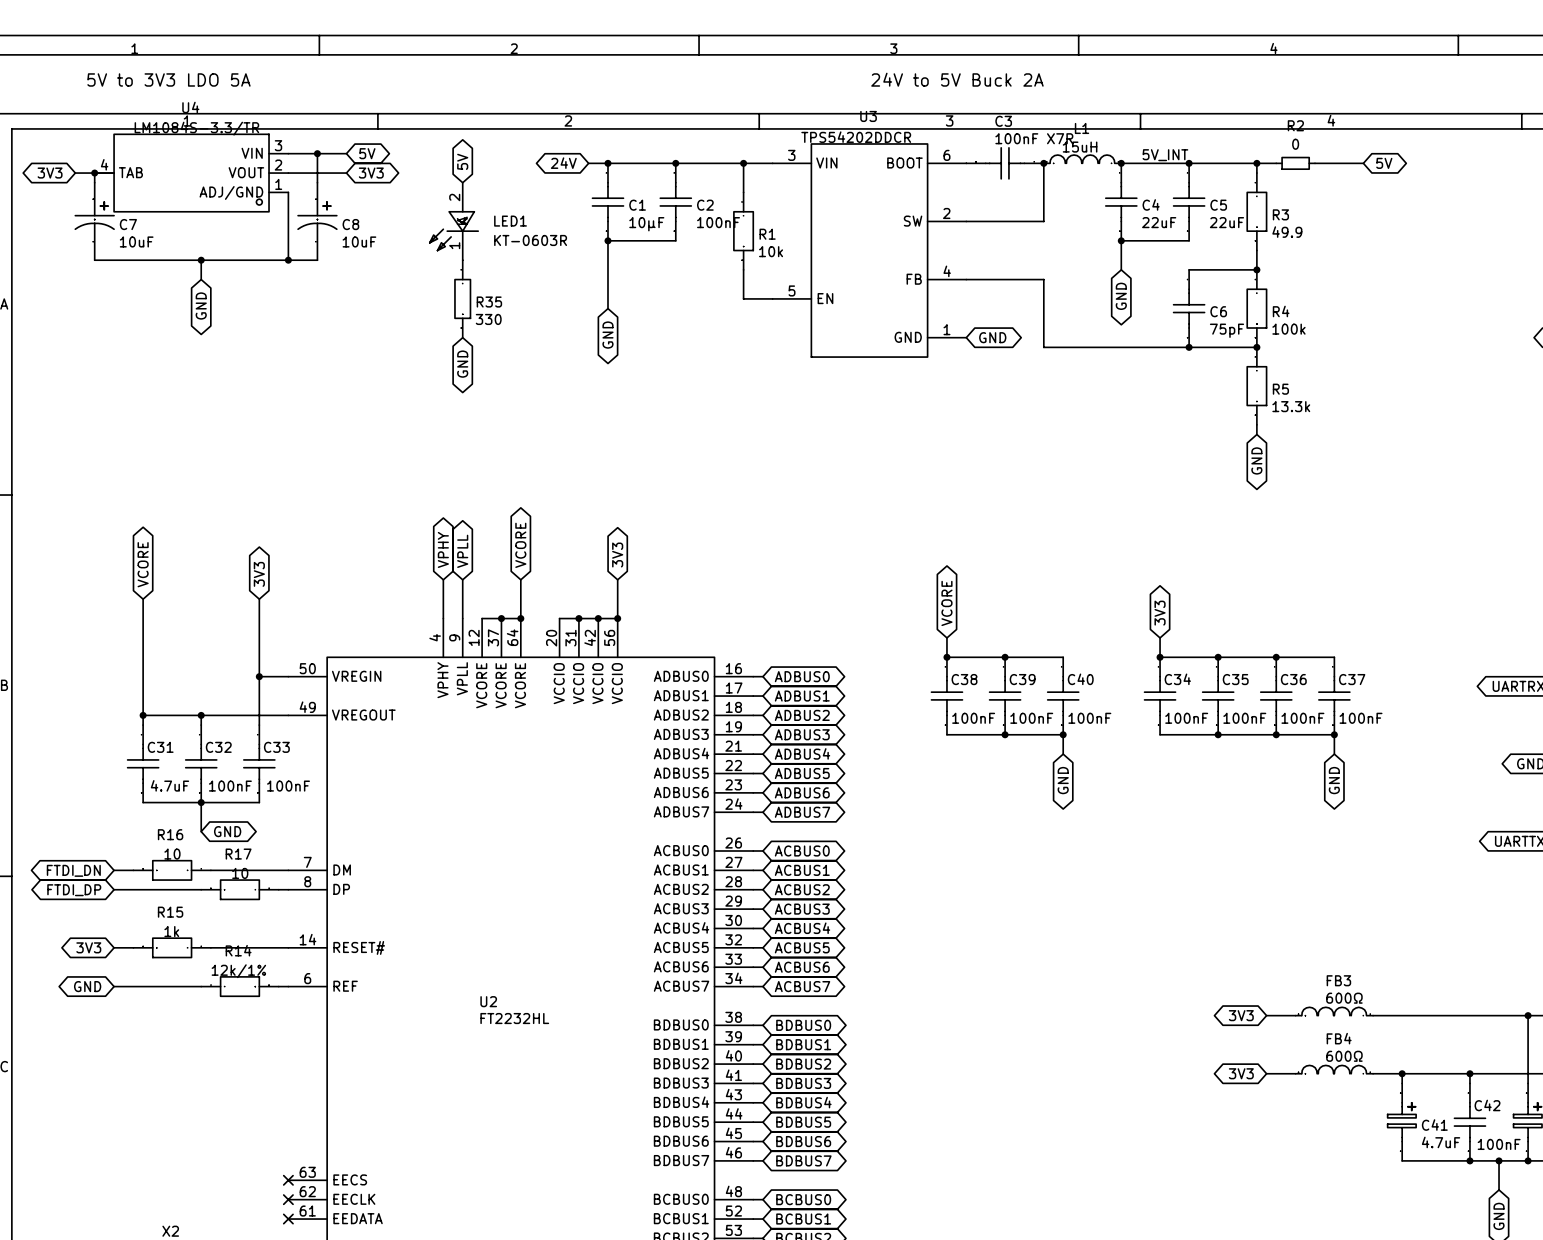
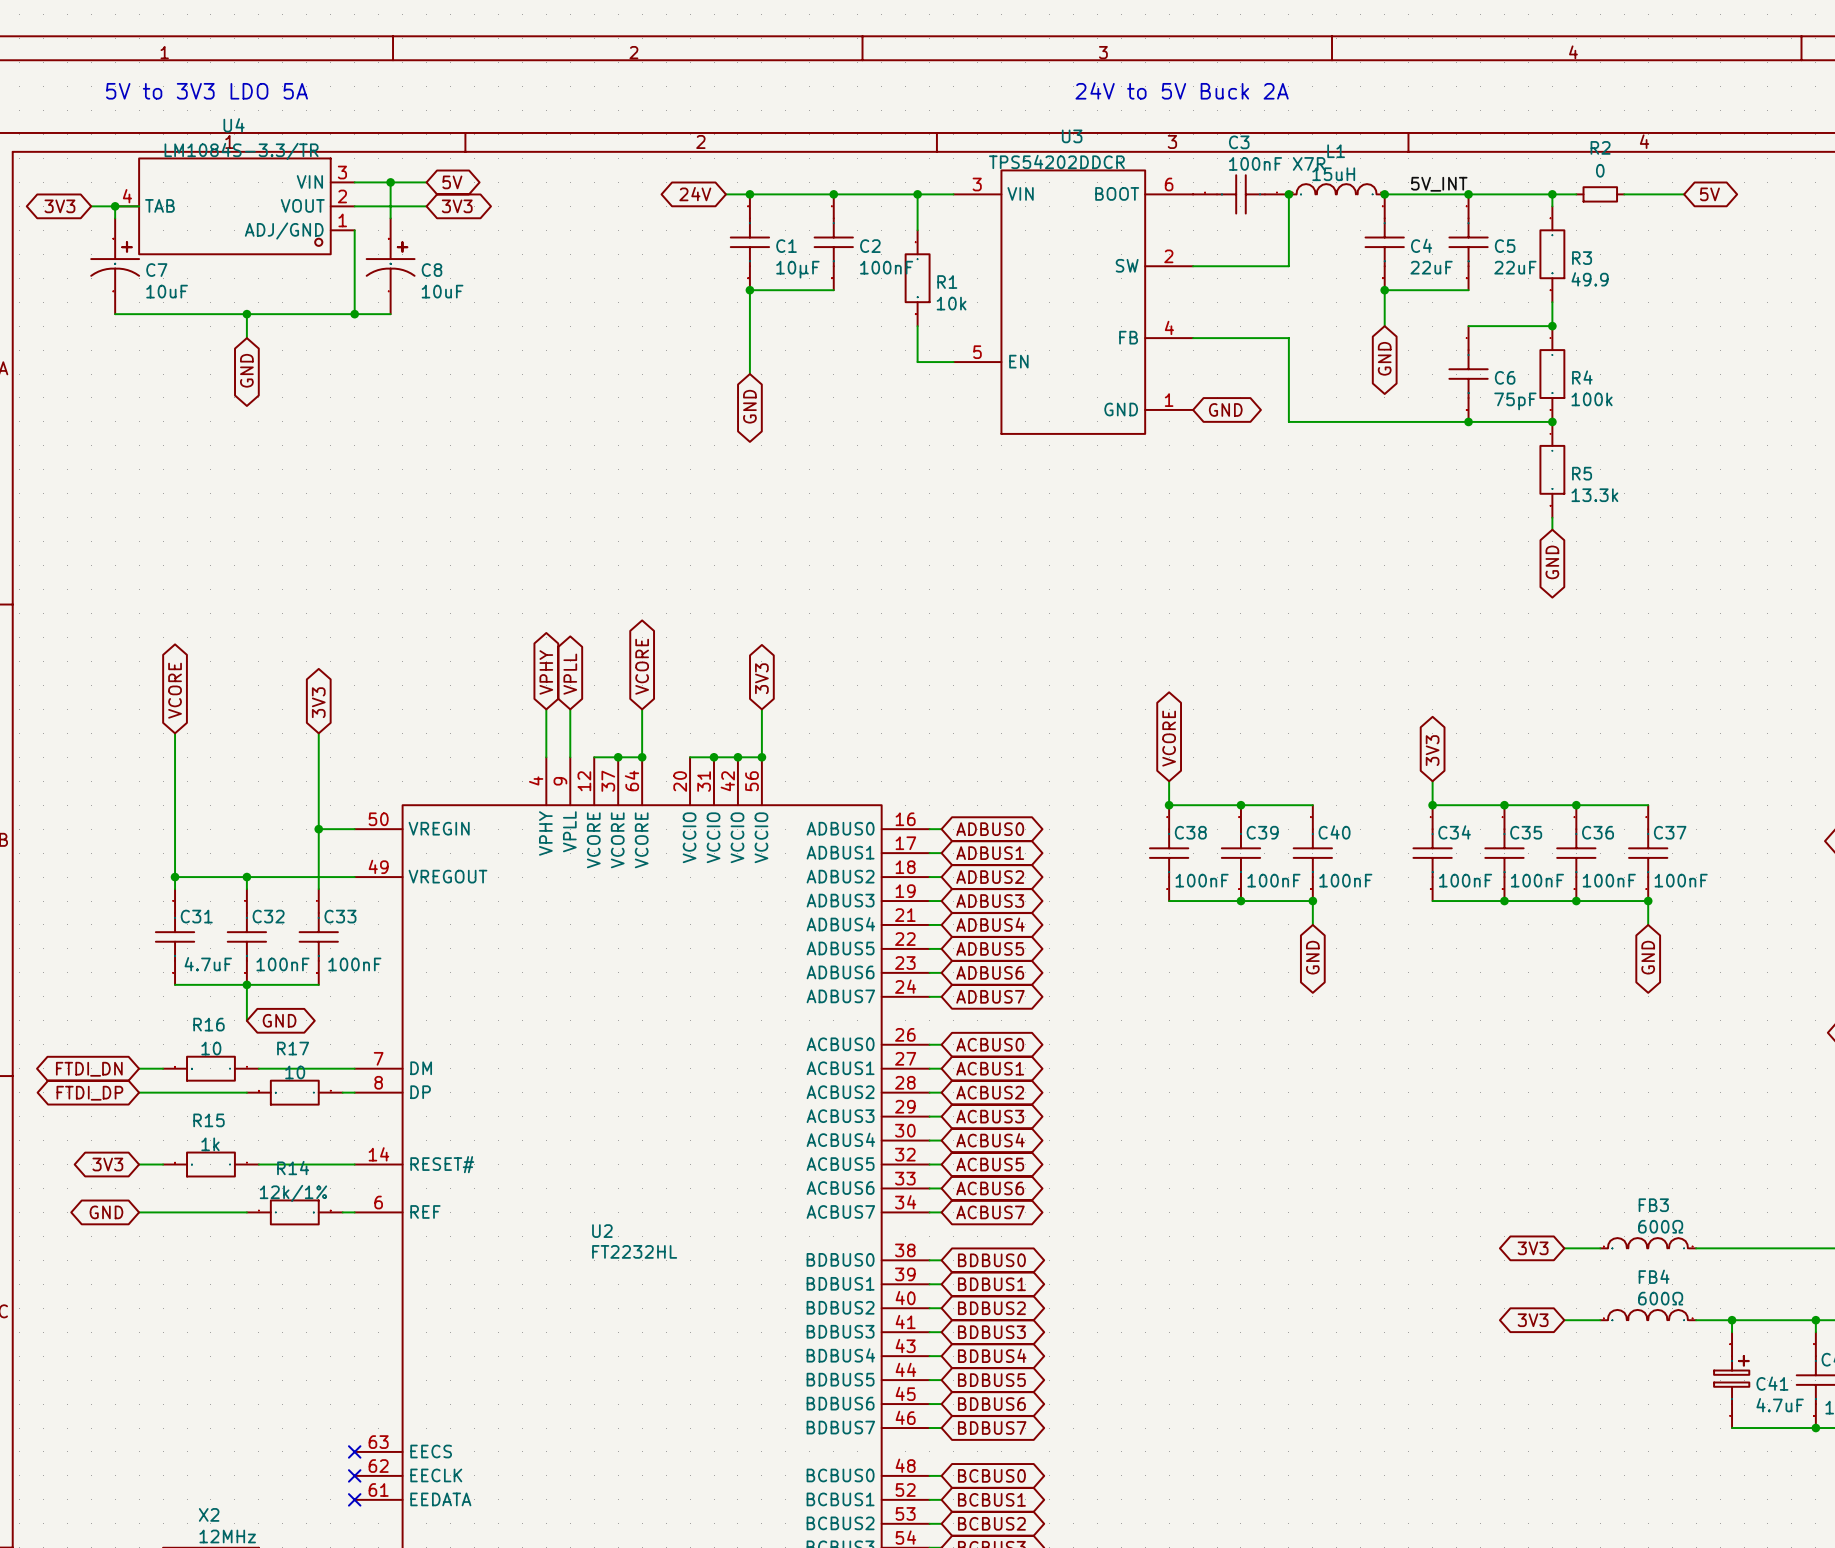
global label: 5V (462, 161) -> none
LED1: KT-0603R (453, 221) -> none
R35: 330 (462, 298) -> none
global label: GND (462, 364) -> none

